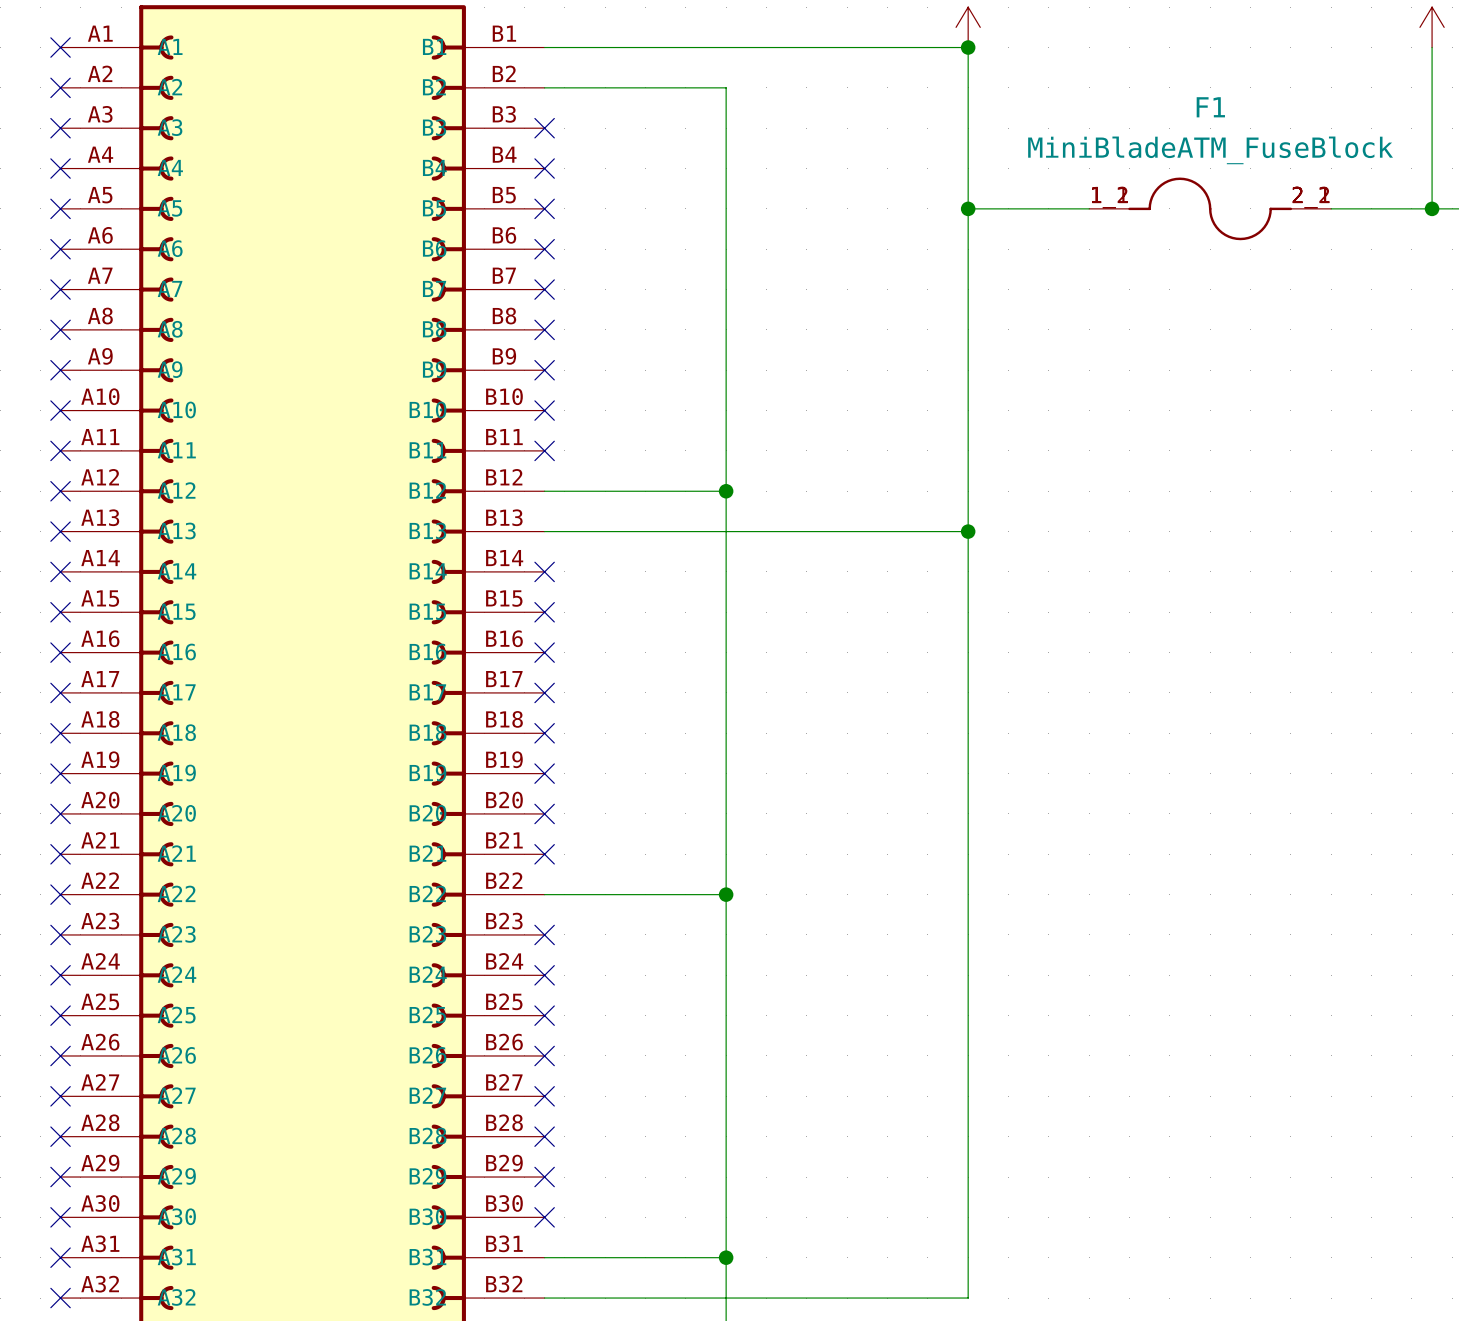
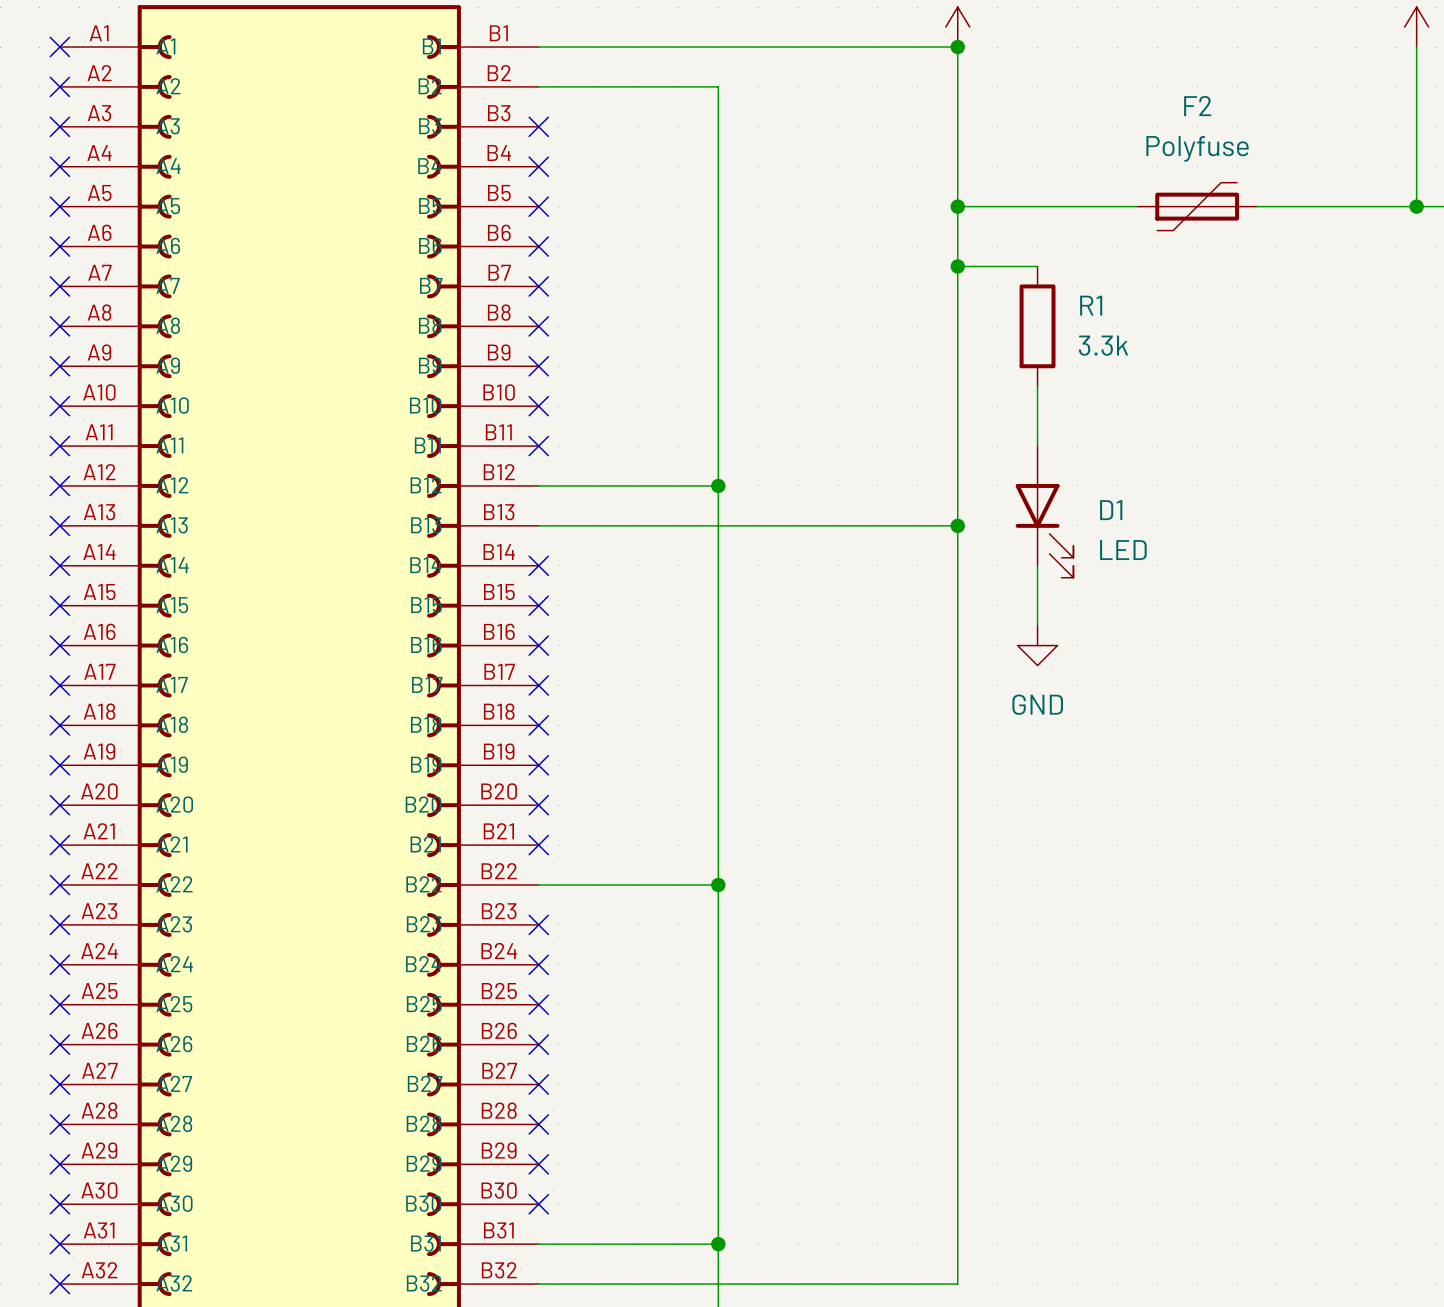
F1: MiniBladeATM_FuseBlock (1210, 208) -> none
F2: none -> Polyfuse (1197, 206)
wire: none -> (957, 266) (1037, 266)
junction: none -> (957, 266)
R1: none -> 3.3k (1037, 326)
wire: none -> (1037, 386) (1037, 446)
D1: none -> LED (1044, 511)
wire: none -> (1037, 565) (1037, 625)
power symbol: none -> GND (1037, 645)

